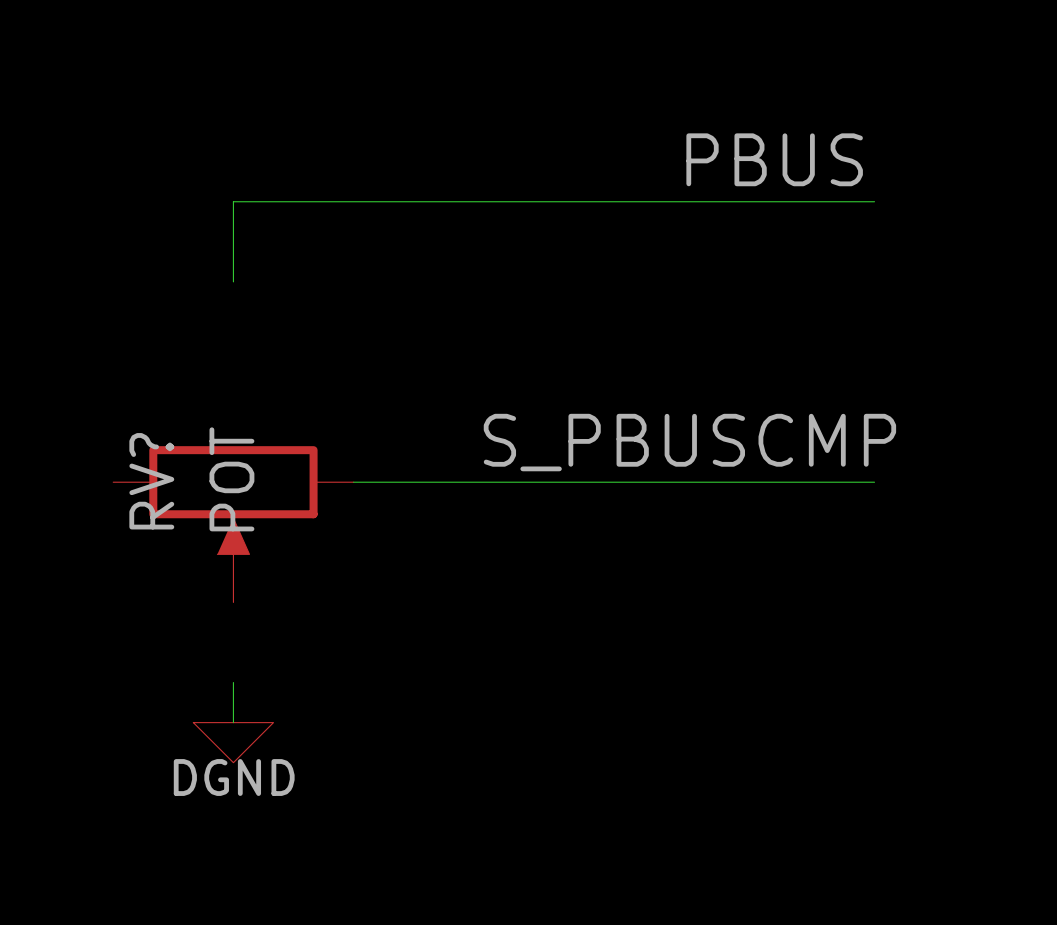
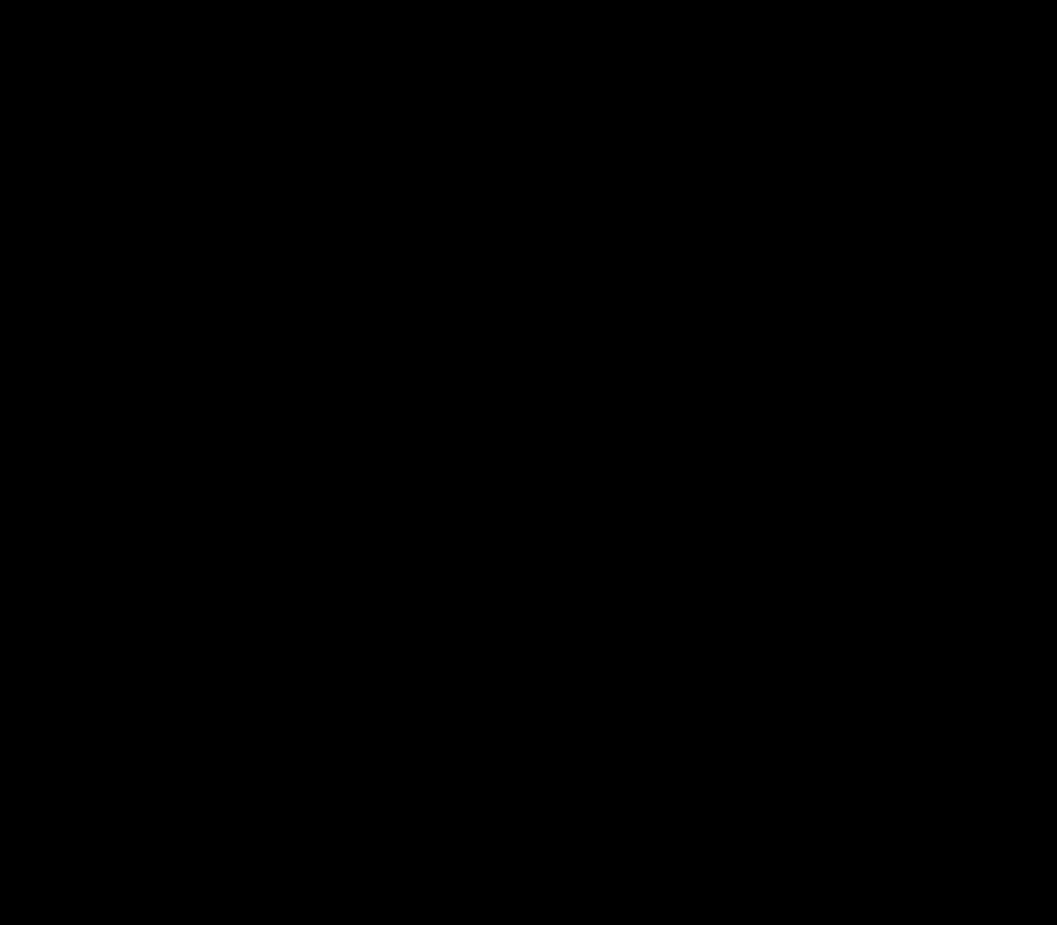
label: PBUS (774, 159) -> none
wire: (874, 201) (233, 201) (233, 281) -> none
label: S_PBUSCMP (689, 442) -> none
wire: (353, 482) (874, 482) -> none
RV?: POT (233, 524) -> none
wire: (233, 682) (233, 722) -> none
power symbol: DGND (233, 742) -> none

